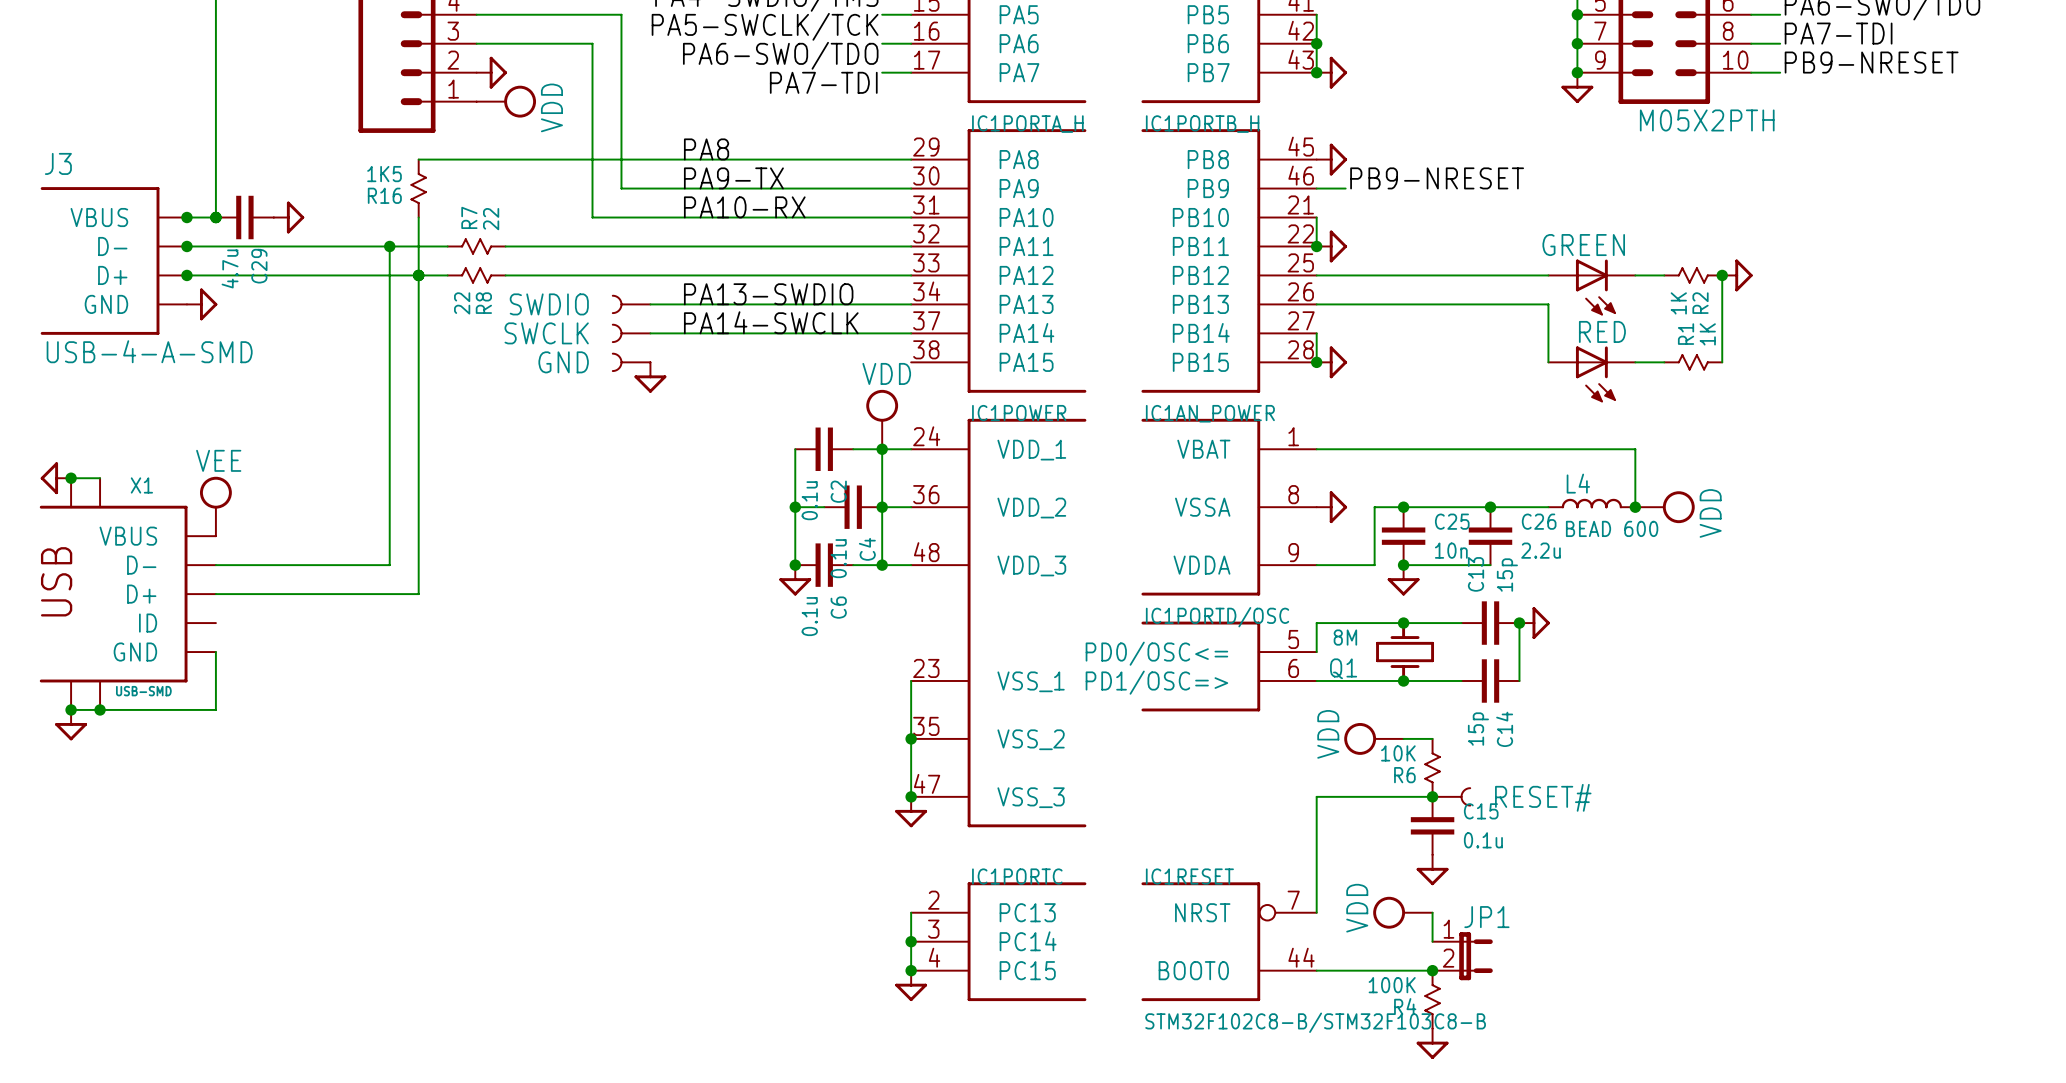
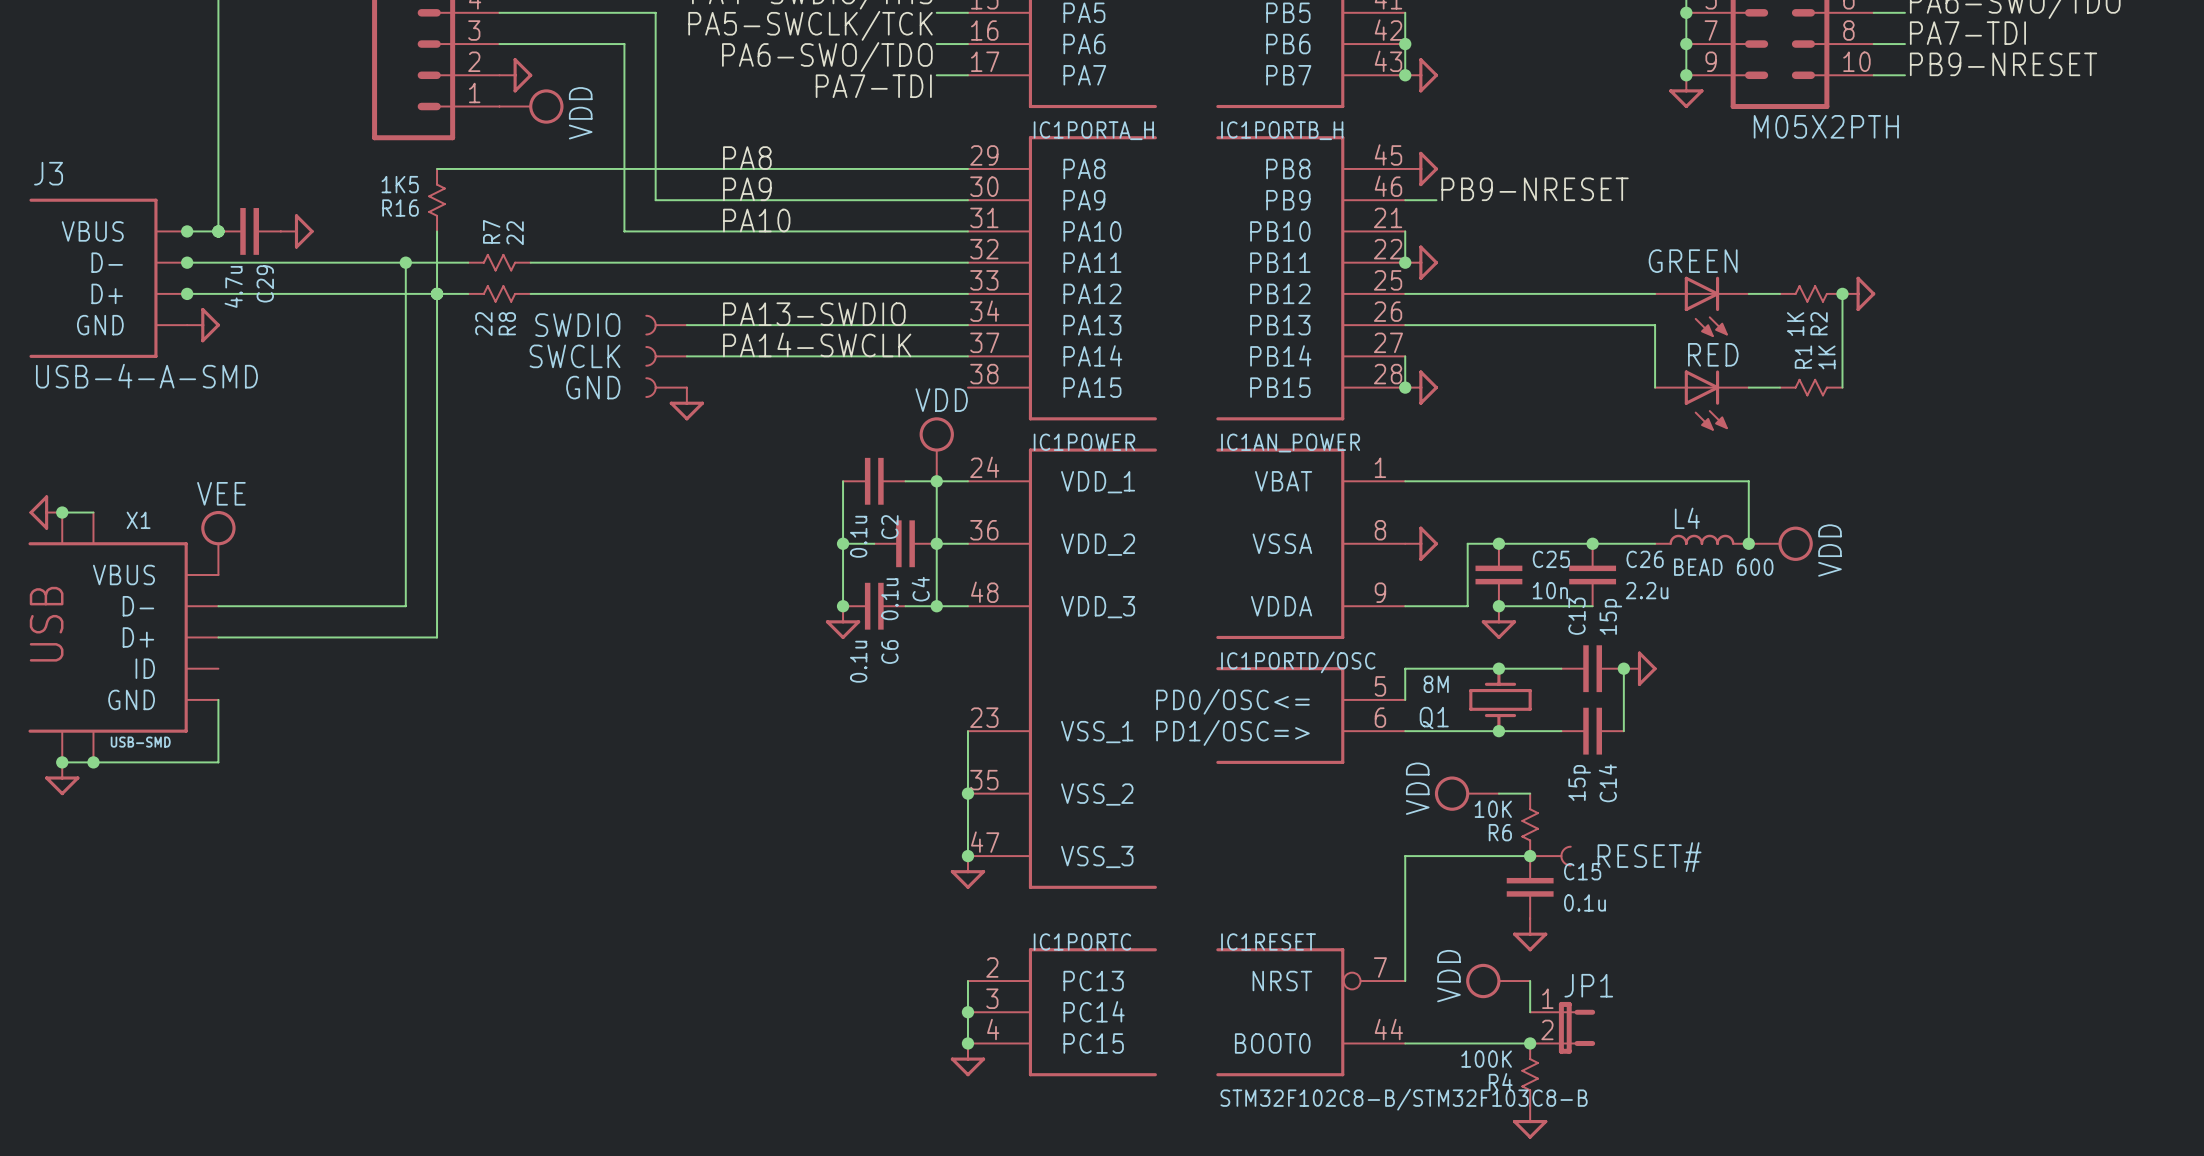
label: PA9-TX (733, 178) -> PA9 (747, 189)
label: PA10-RX (744, 207) -> PA10 (756, 220)

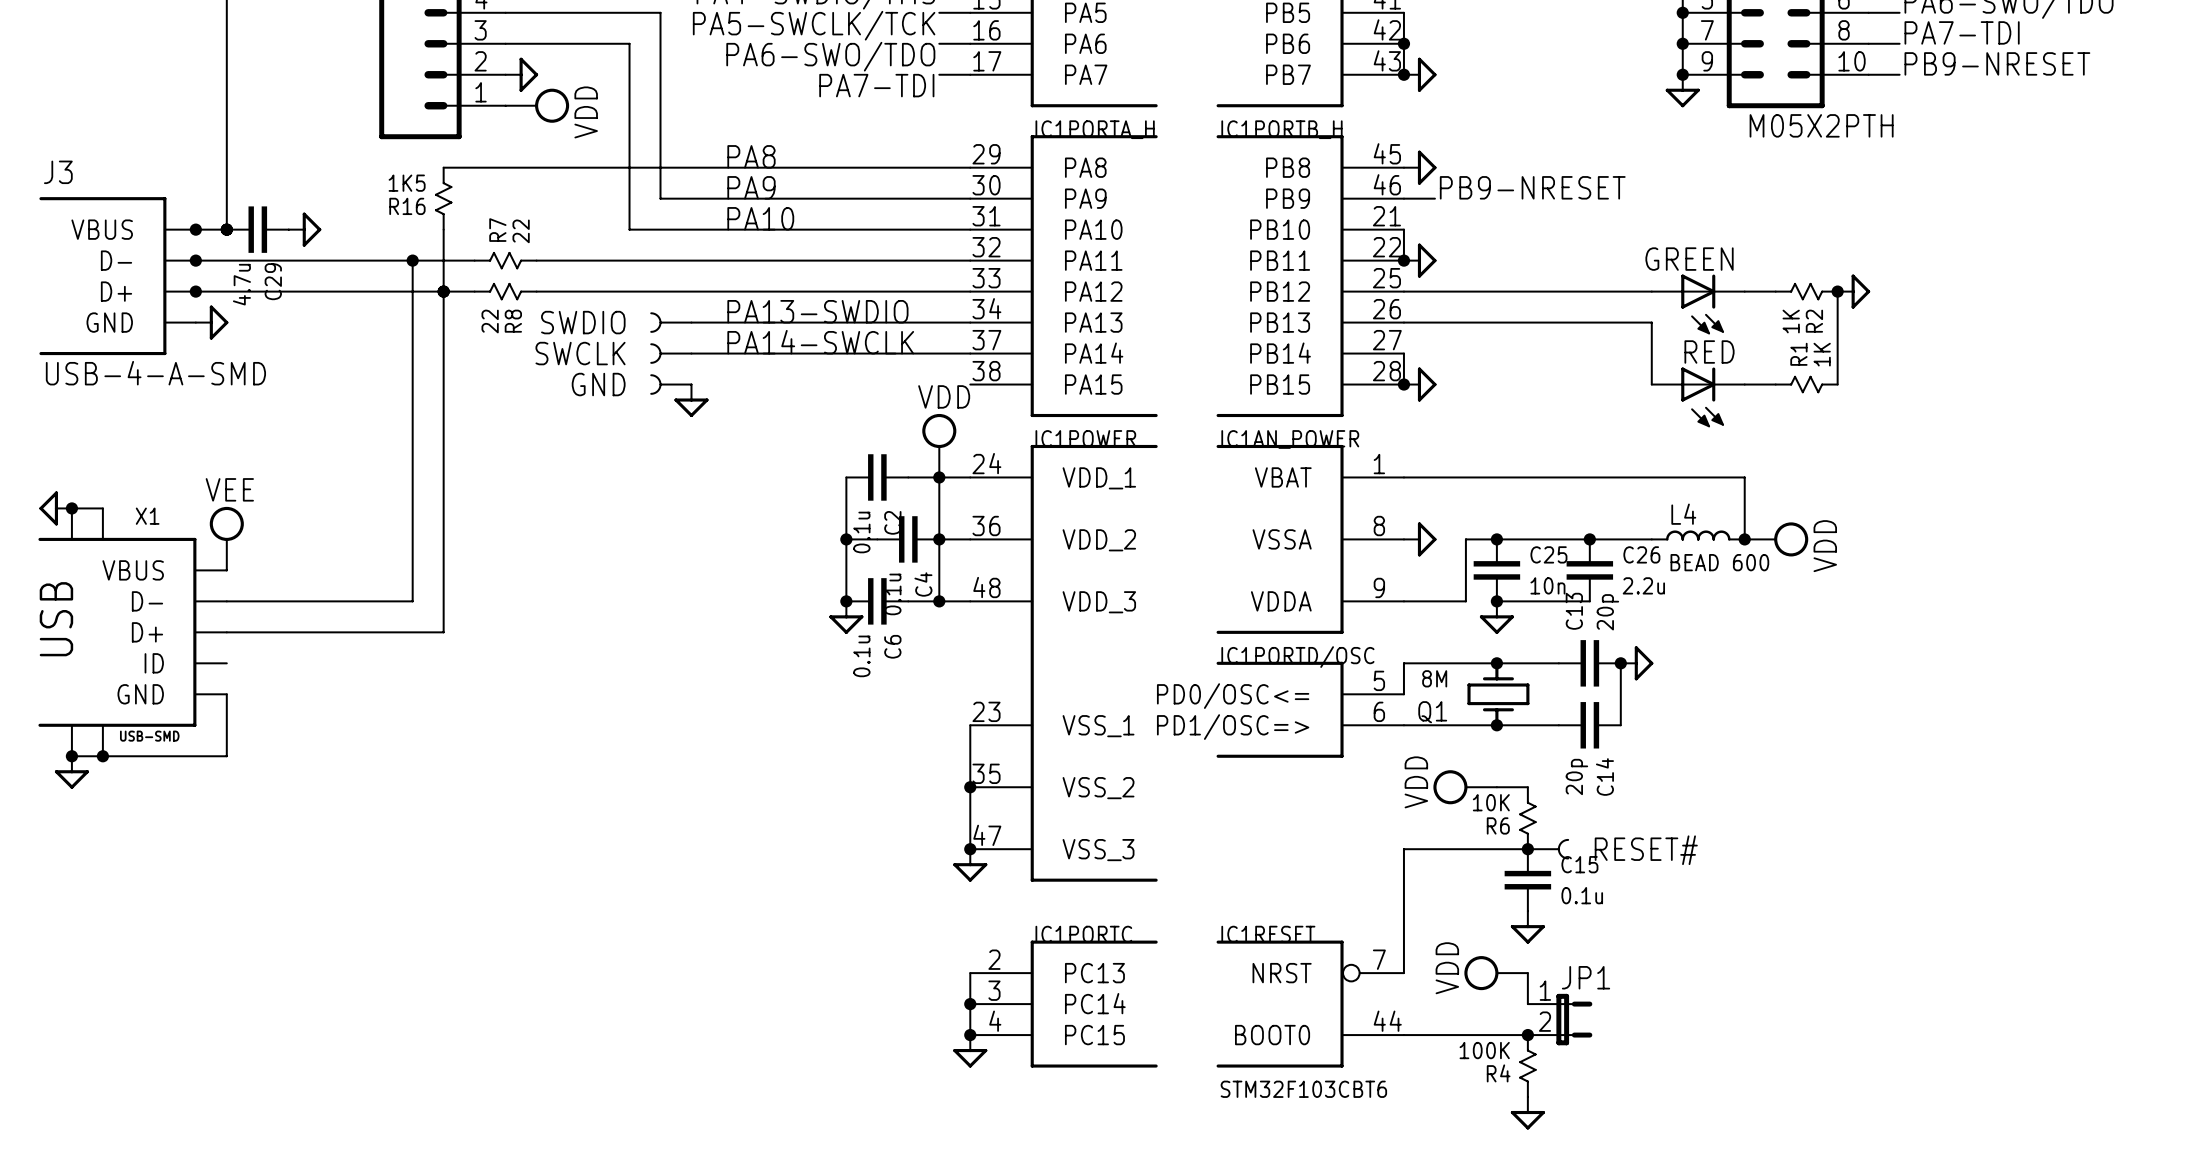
C13 value: 15p (1610, 616) -> 20p (1607, 612)
C14 value: 15p (1579, 782) -> 20p (1576, 776)
IC1RESET value: STM32F102C8-B/STM32F103C8-B (1404, 1099) -> STM32F103CBT6 (1303, 1089)

